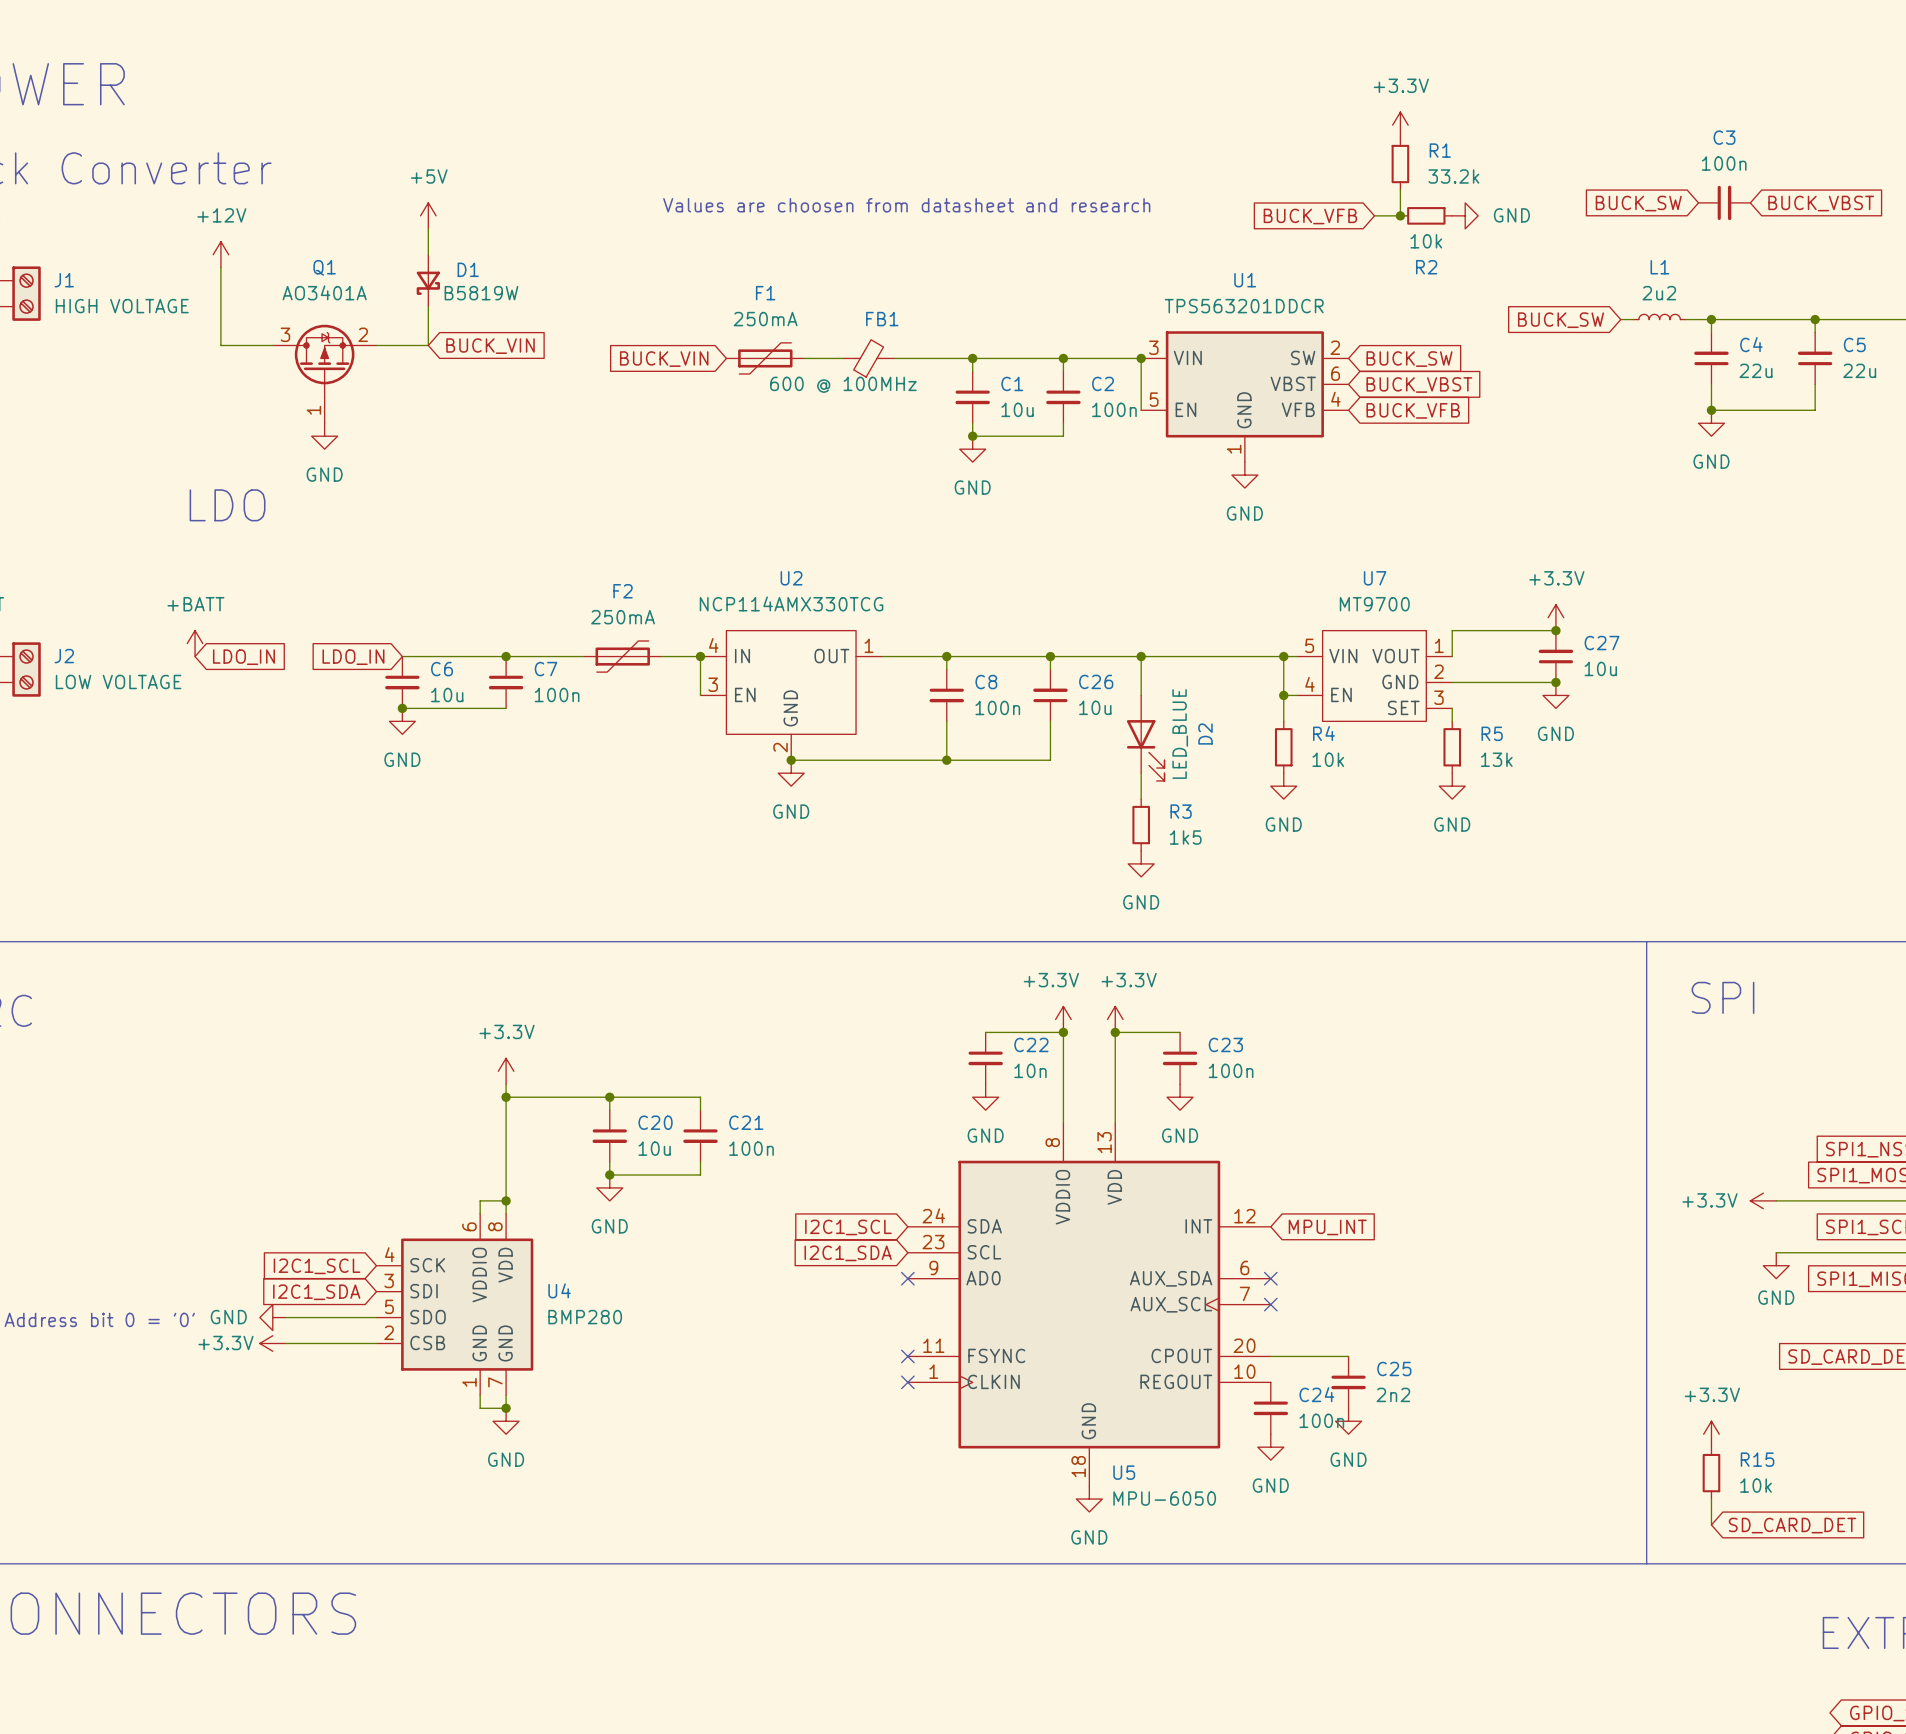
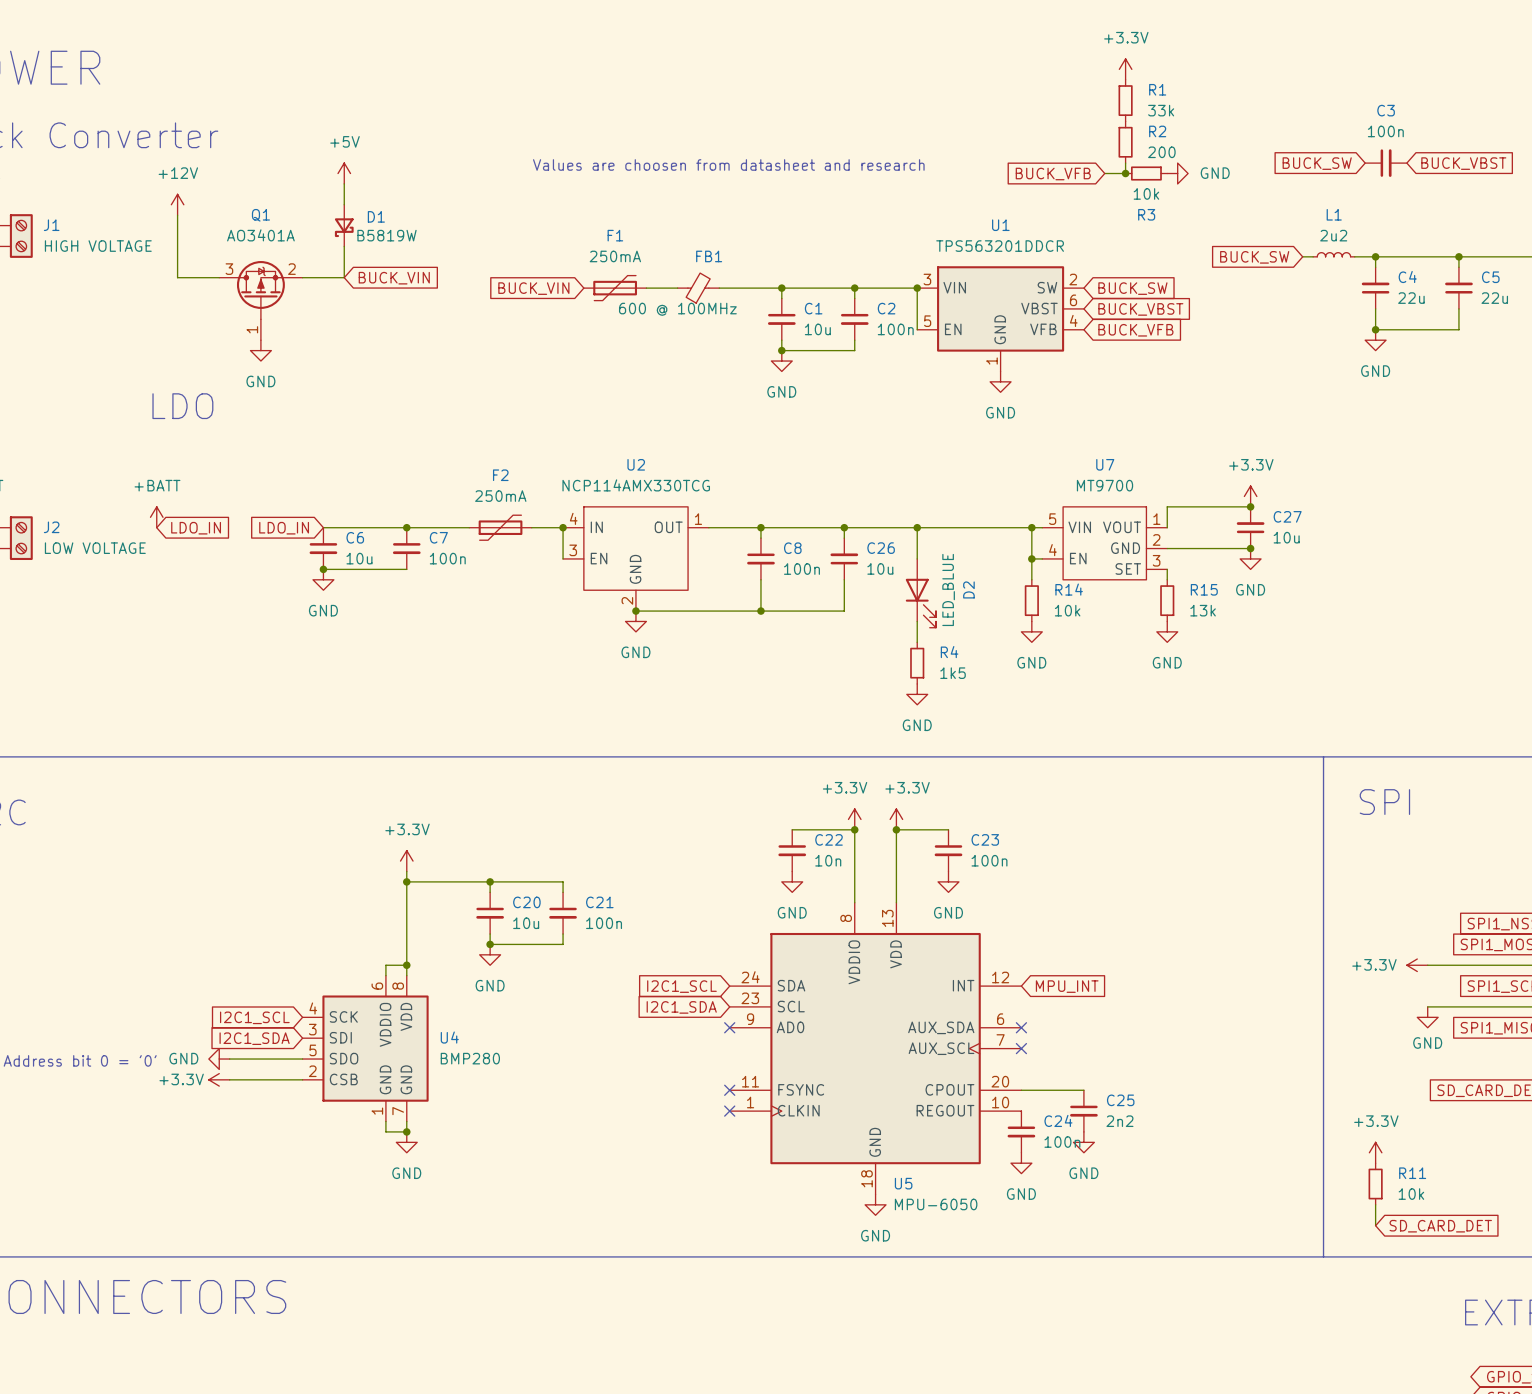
power symbol position: +3.3V (1400, 125) -> +3.3V (1125, 69)
R1 position: (1400, 164) -> (1125, 100)
R2: none -> 200 (1125, 142)
R1 value: 33.2k (1453, 176) -> 33k (1161, 110)
R2 name: R2 (1426, 267) -> R3 (1146, 214)
R4 name: R4 (1323, 733) -> R14 (1069, 589)
R5 name: R5 (1492, 733) -> R15 (1204, 589)
R3 name: R3 (1181, 811) -> R4 (949, 652)
R15 name: R15 (1757, 1459) -> R11 (1412, 1173)

